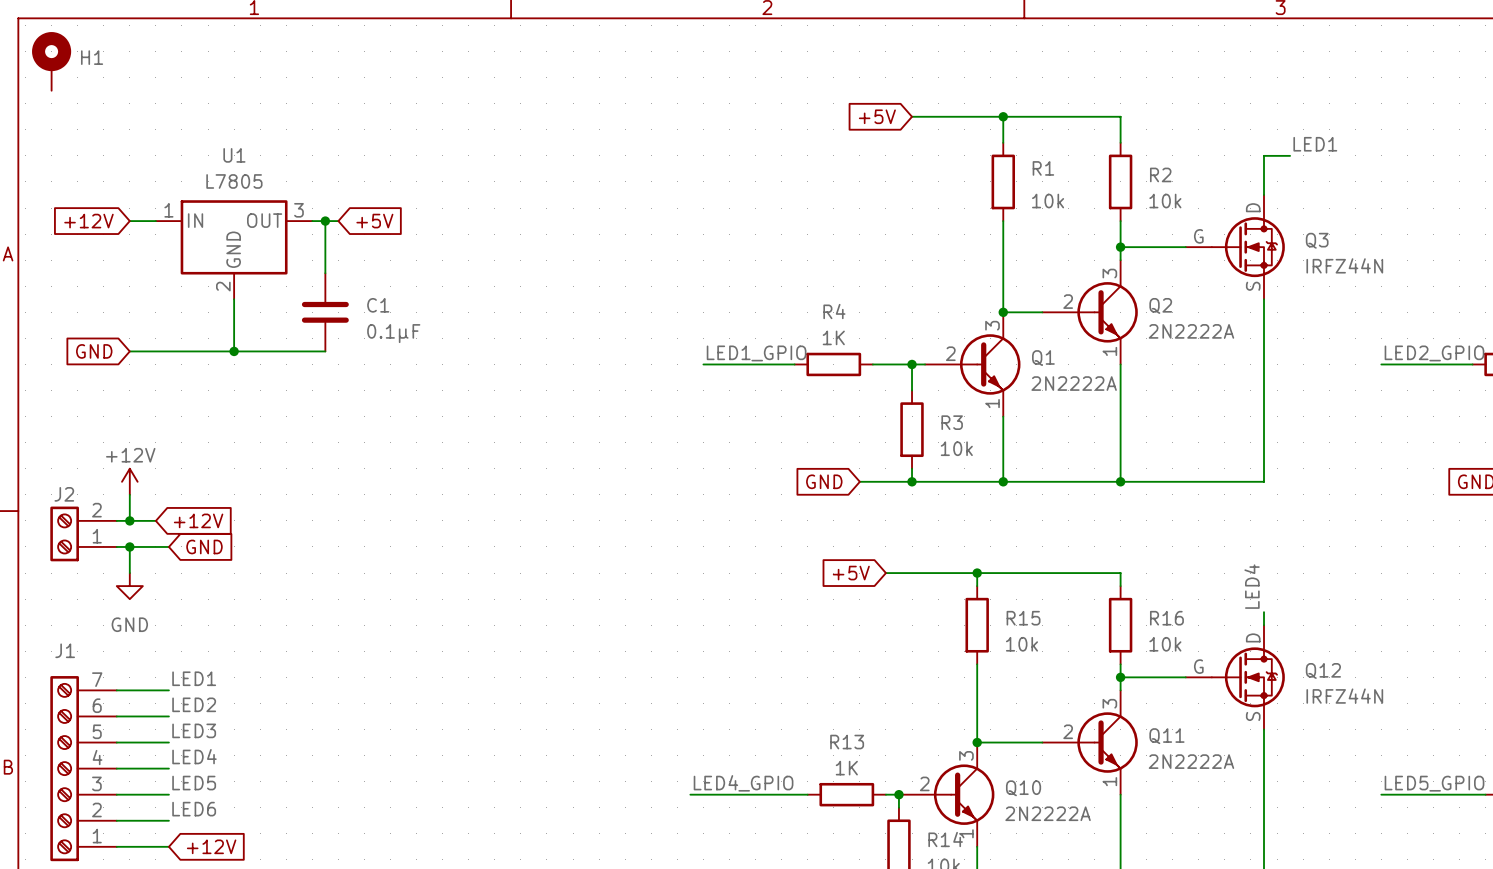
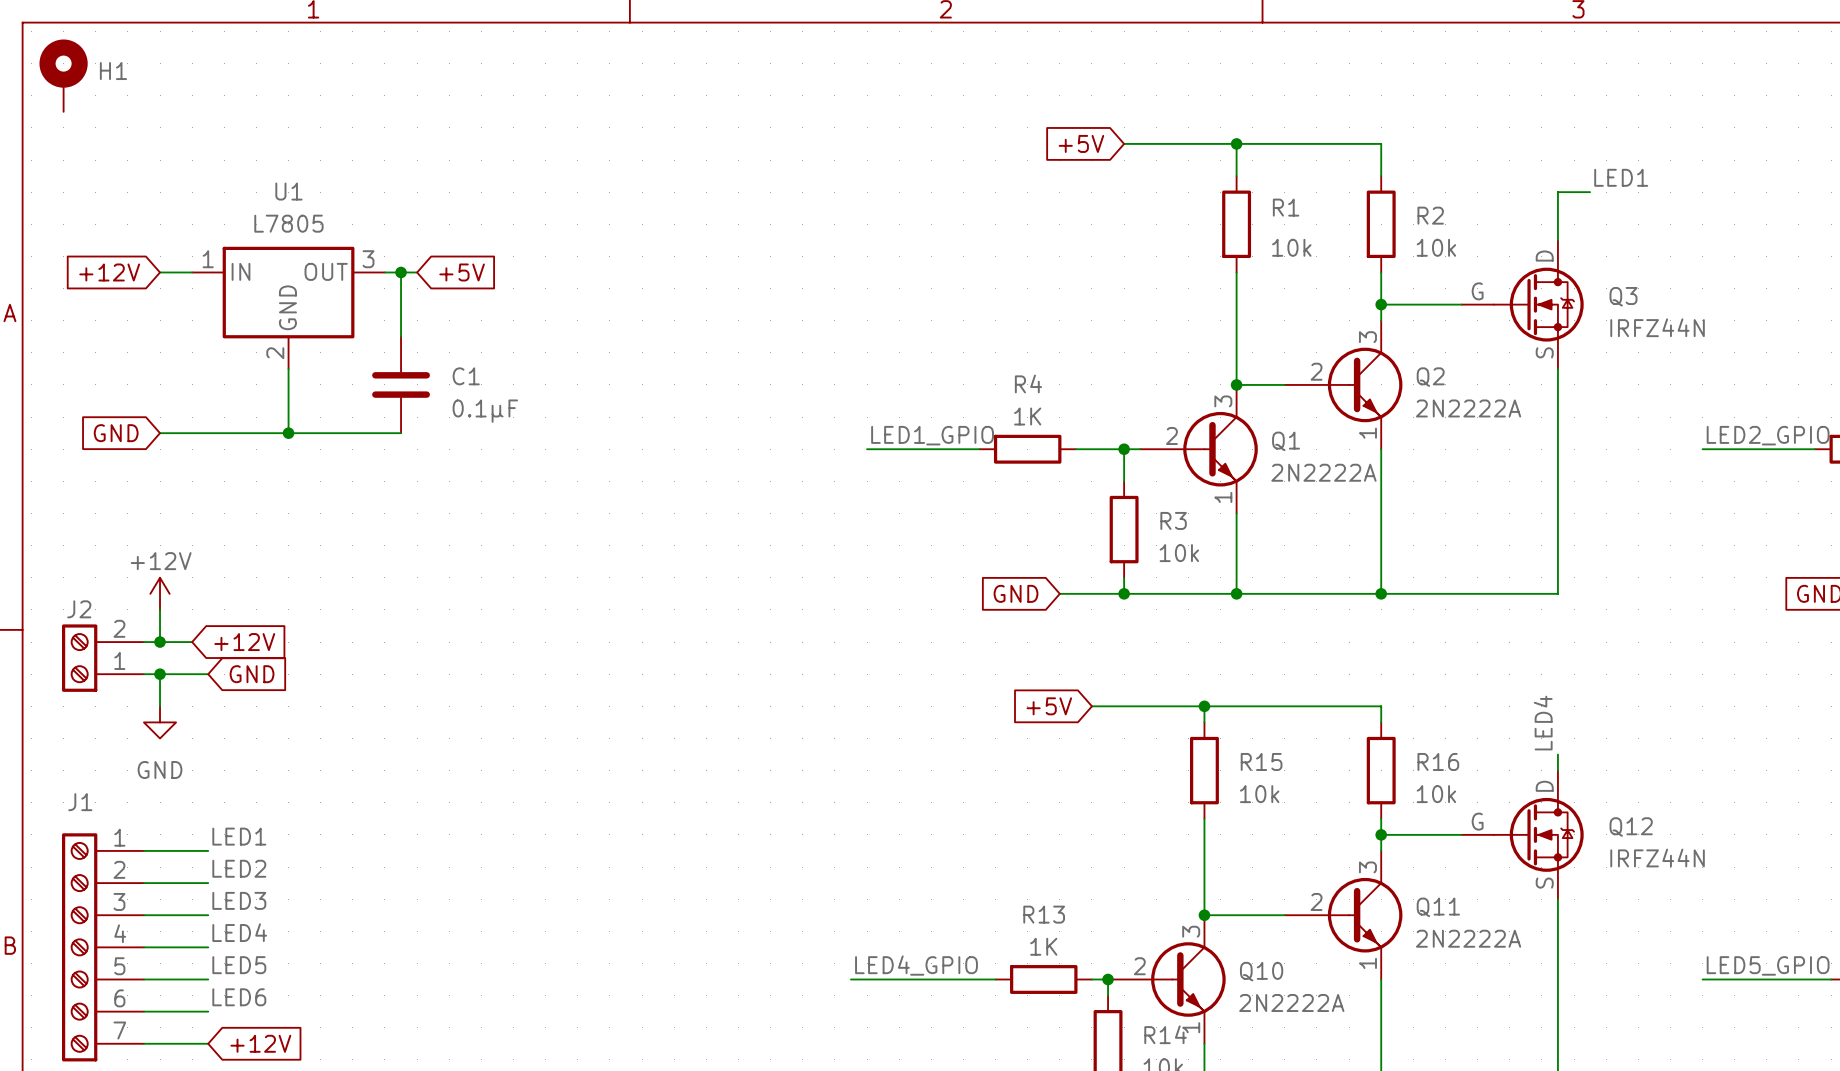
J1 pin number: 7 (97, 679) -> 1 (119, 837)
J1 pin number: 6 (97, 705) -> 2 (119, 869)
J1 pin number: 5 (97, 731) -> 3 (119, 901)
J1 pin number: 3 (96, 783) -> 5 (119, 966)
J1 pin number: 2 (96, 810) -> 6 (119, 998)
J1 pin number: 1 (97, 836) -> 7 (119, 1030)

